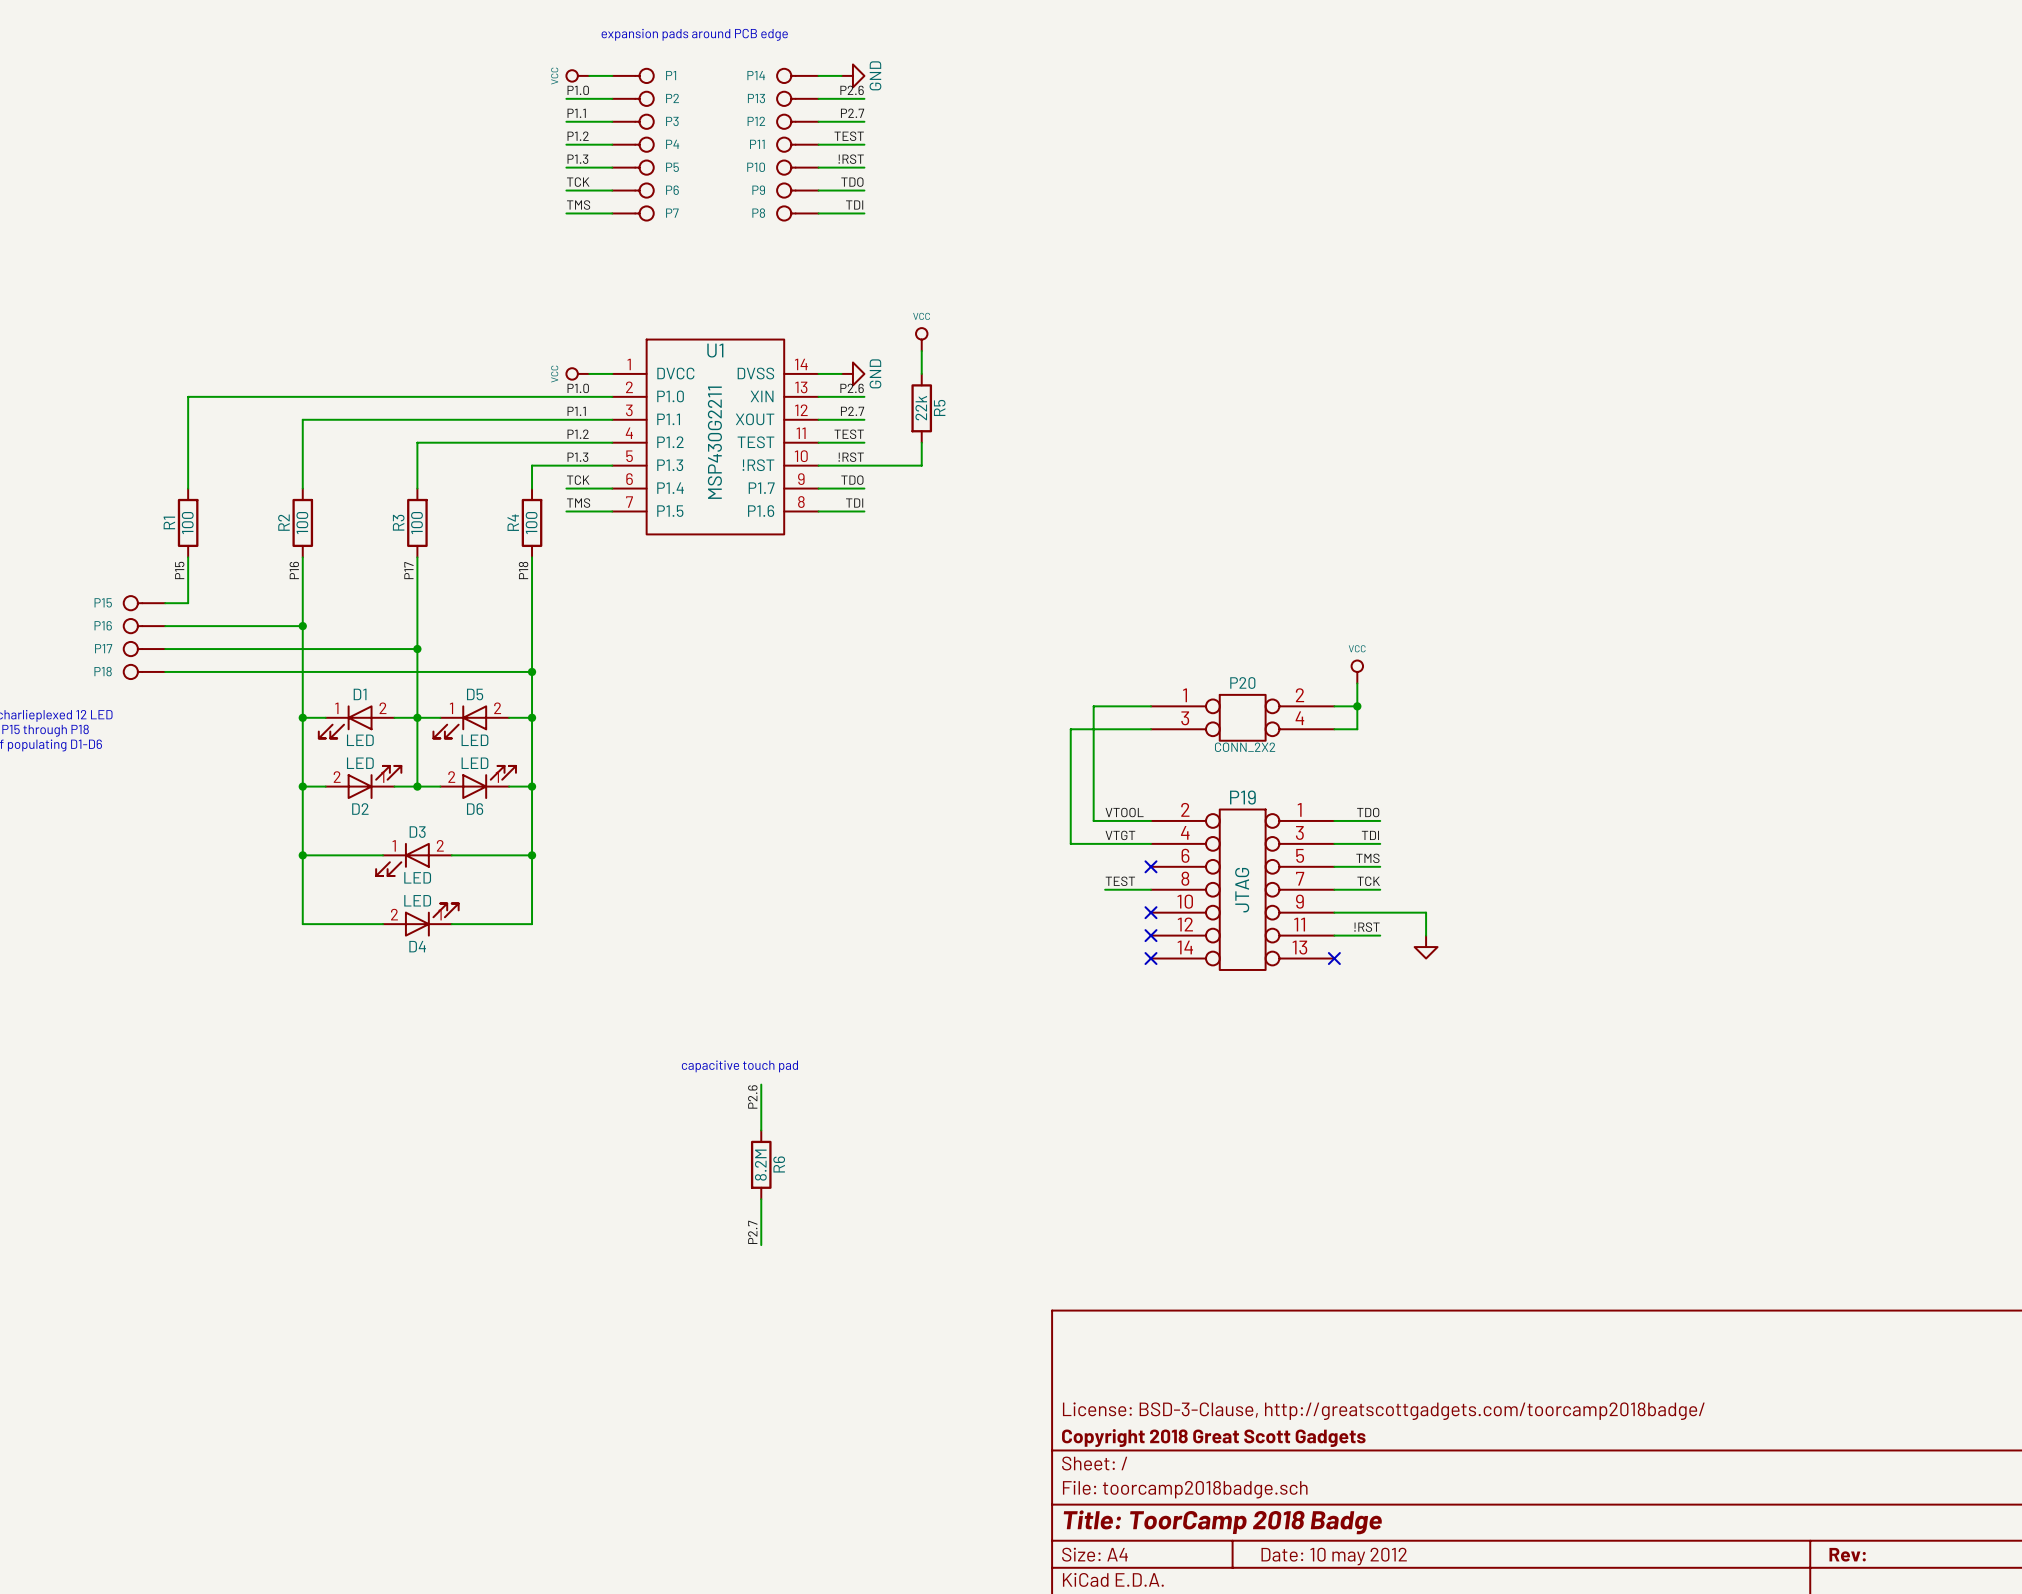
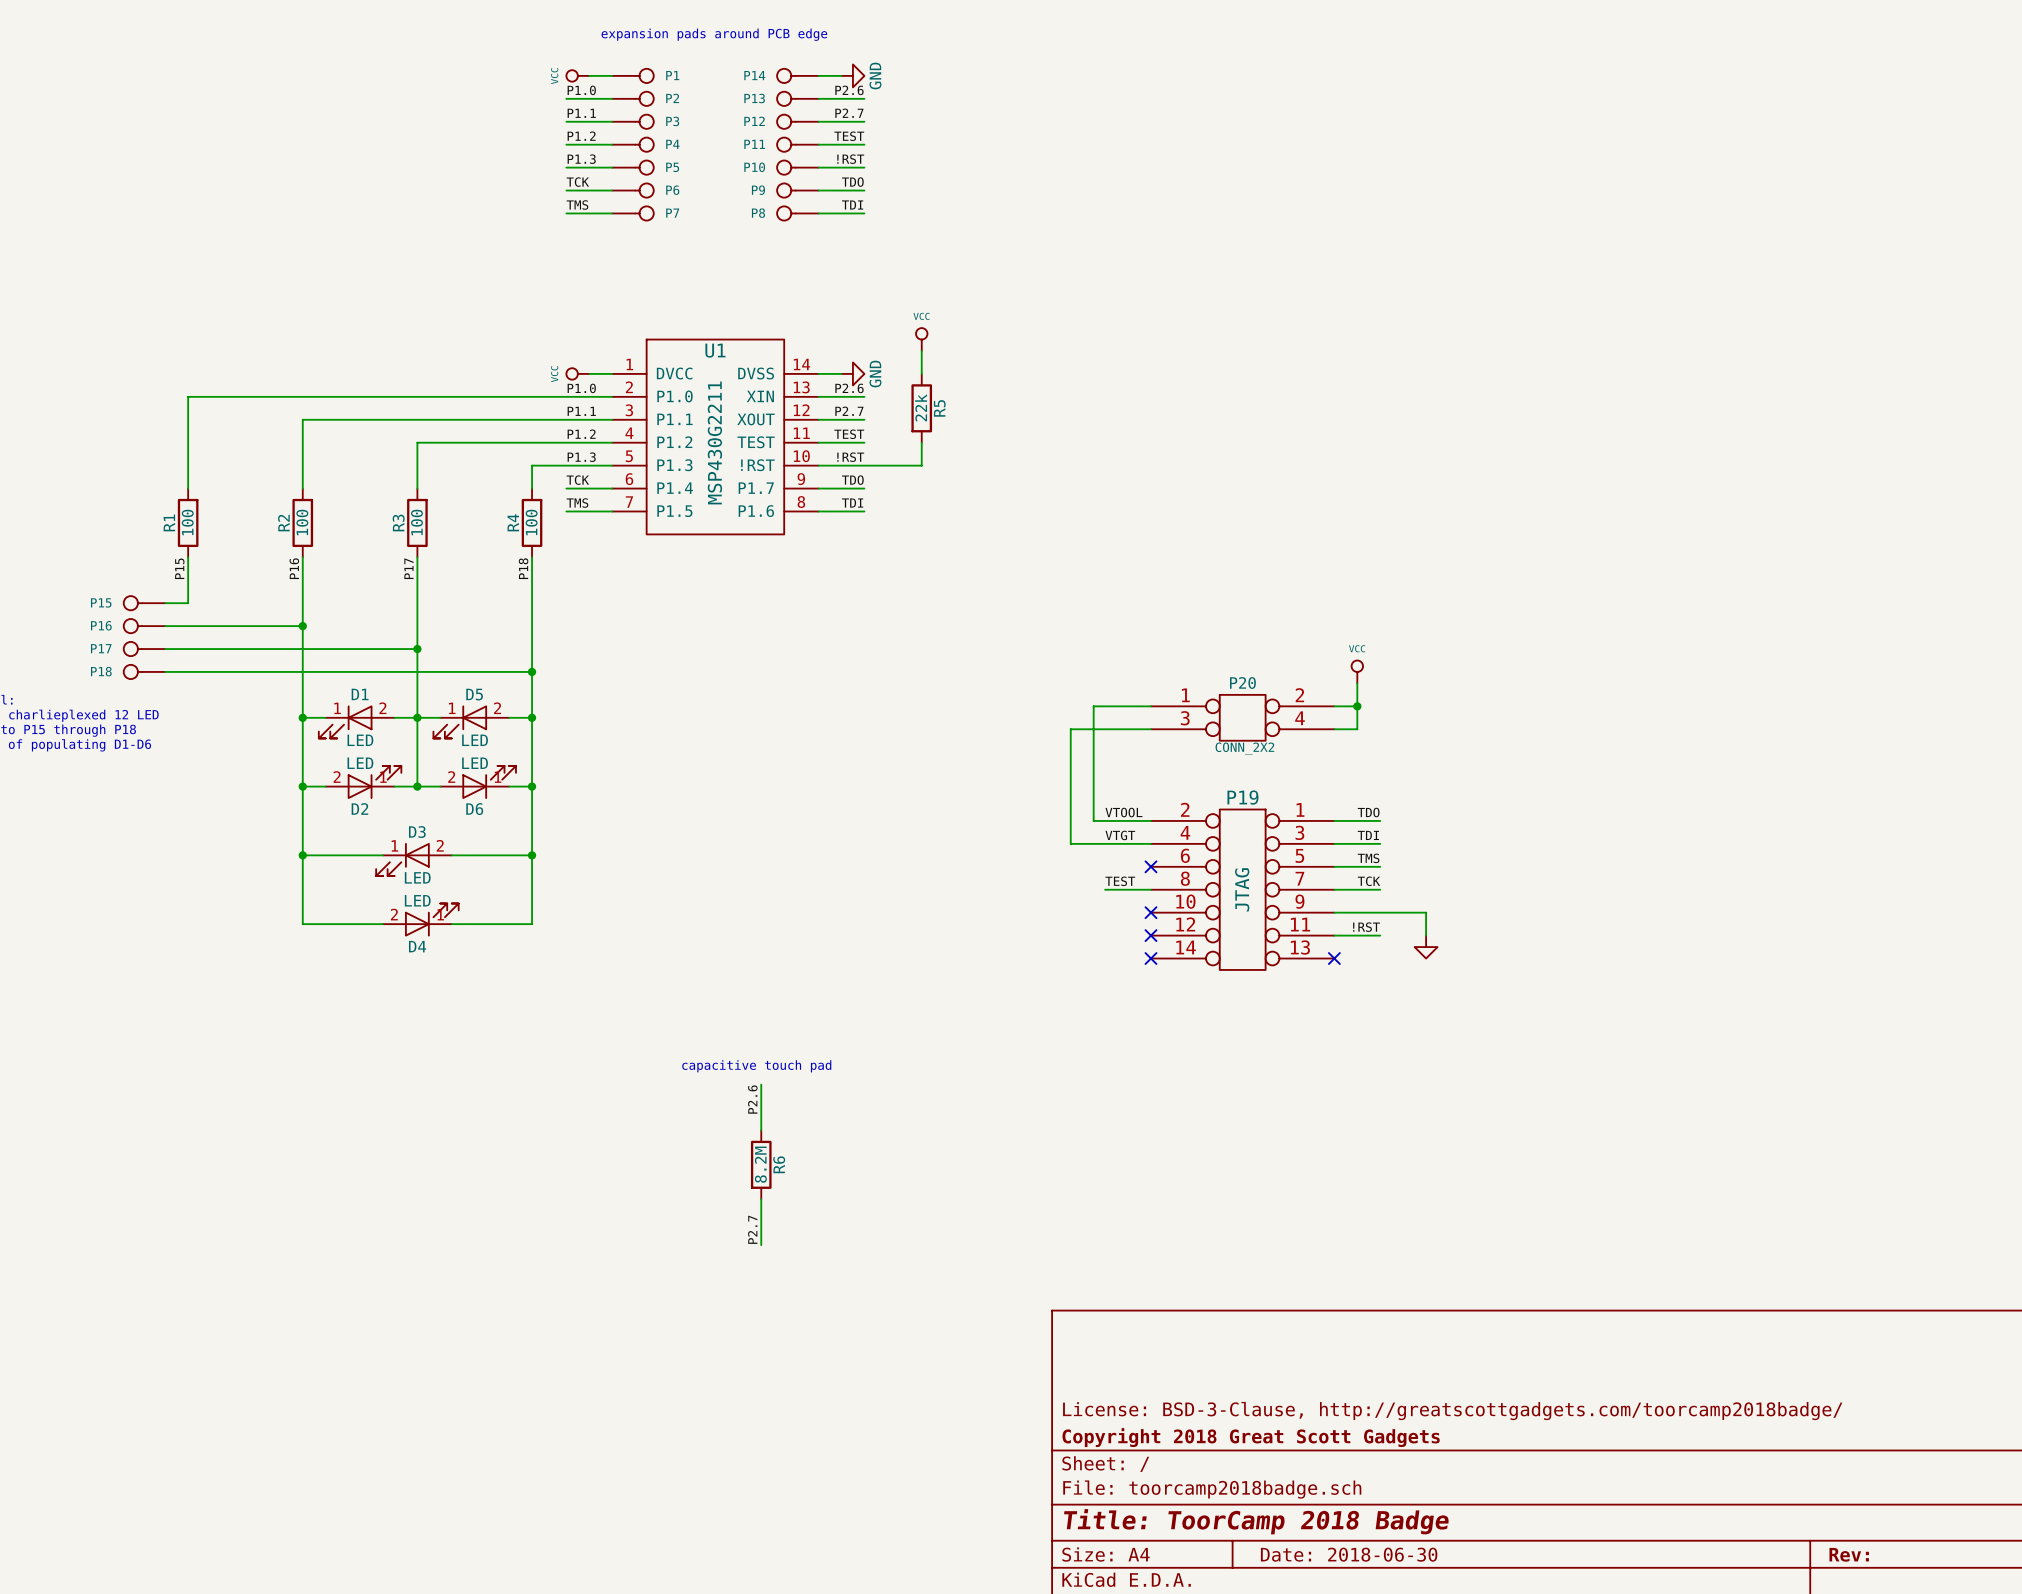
title block: Date: 10 may 2012 (1334, 1556) -> Date: 2018-06-30 (1349, 1554)

